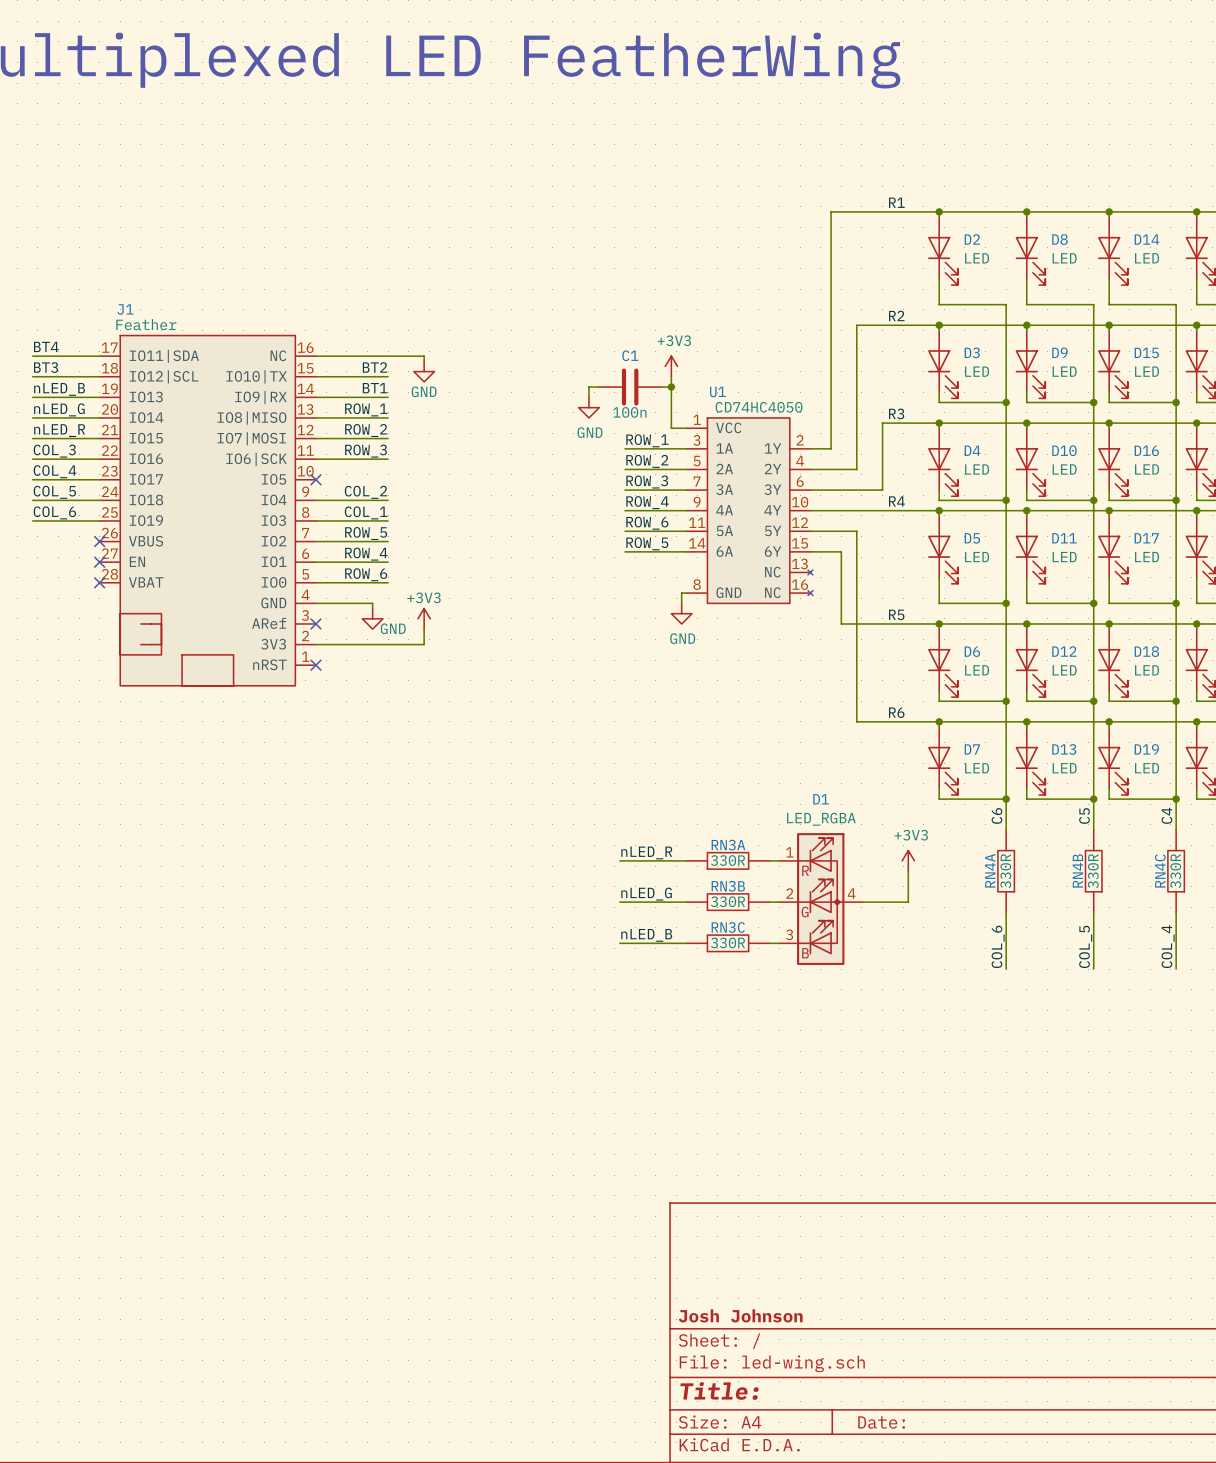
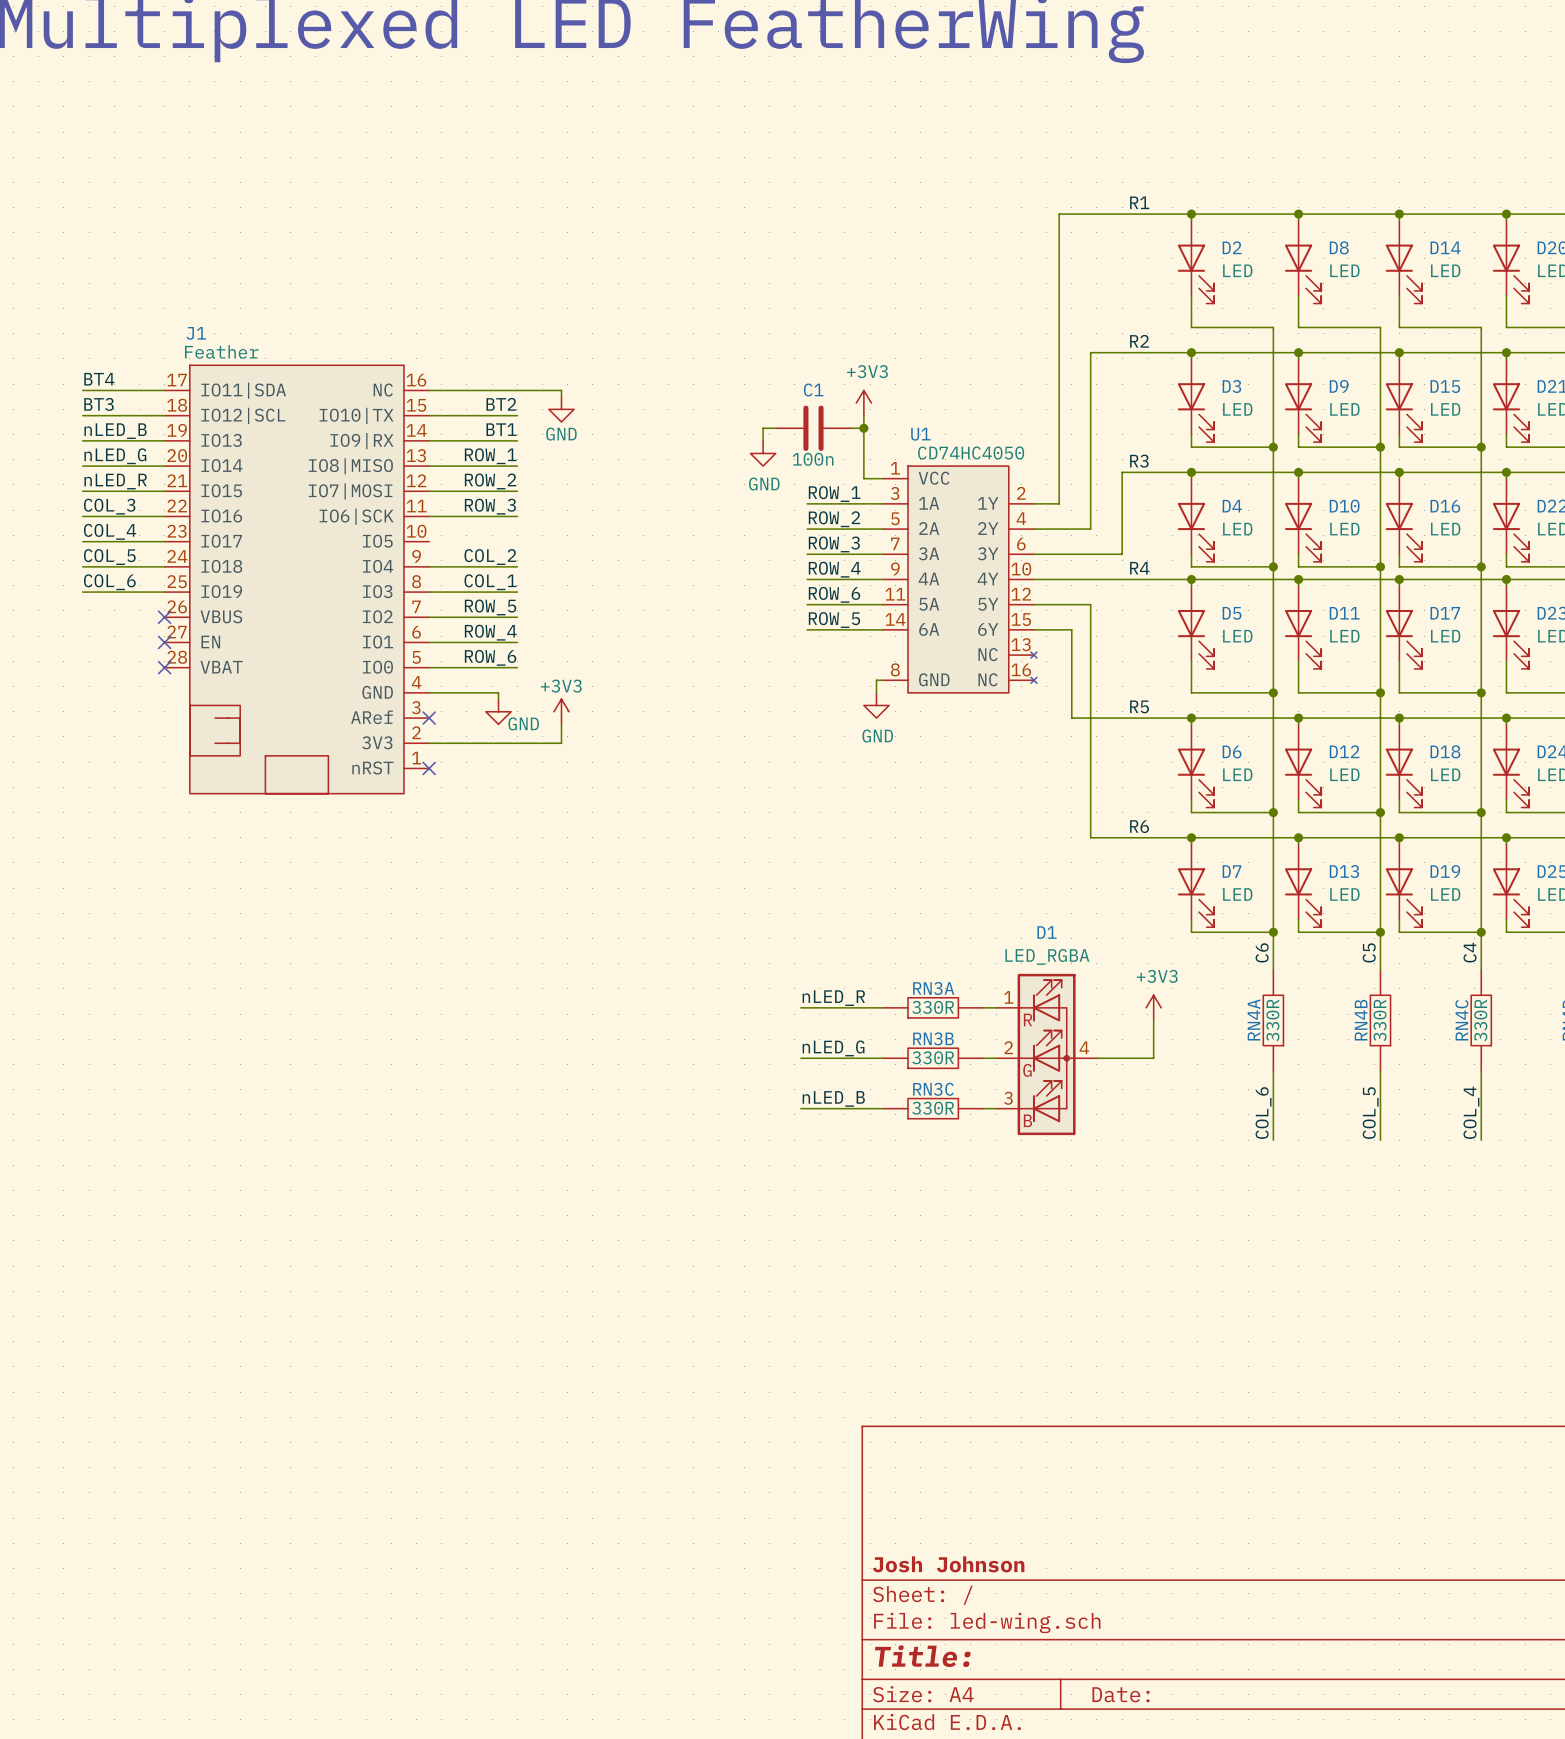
no-connect mark: (315, 479) -> none

